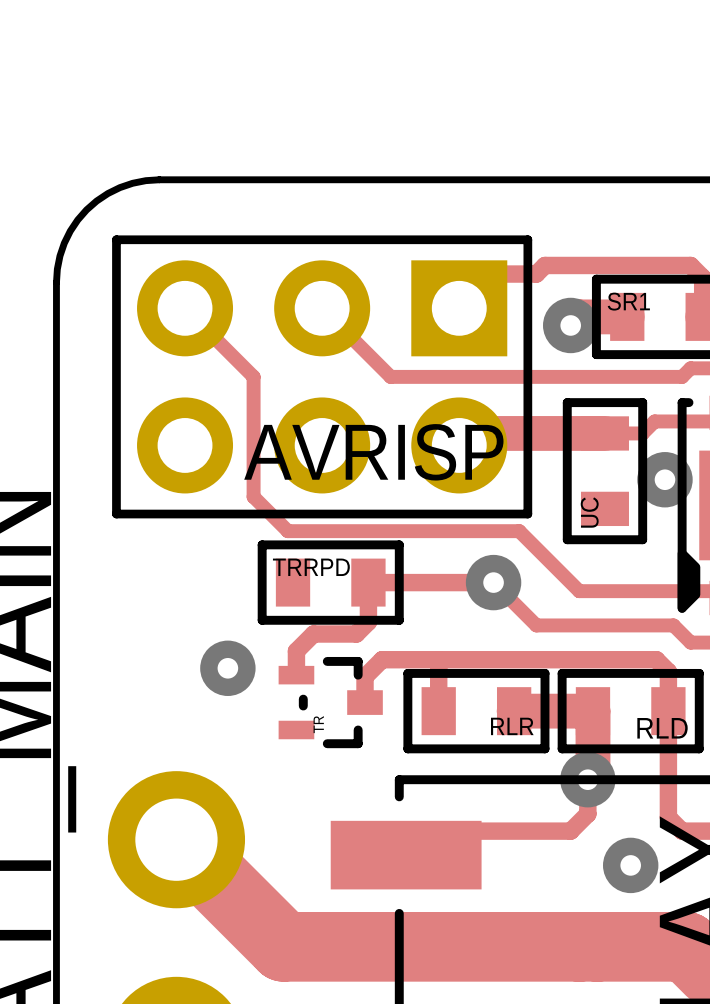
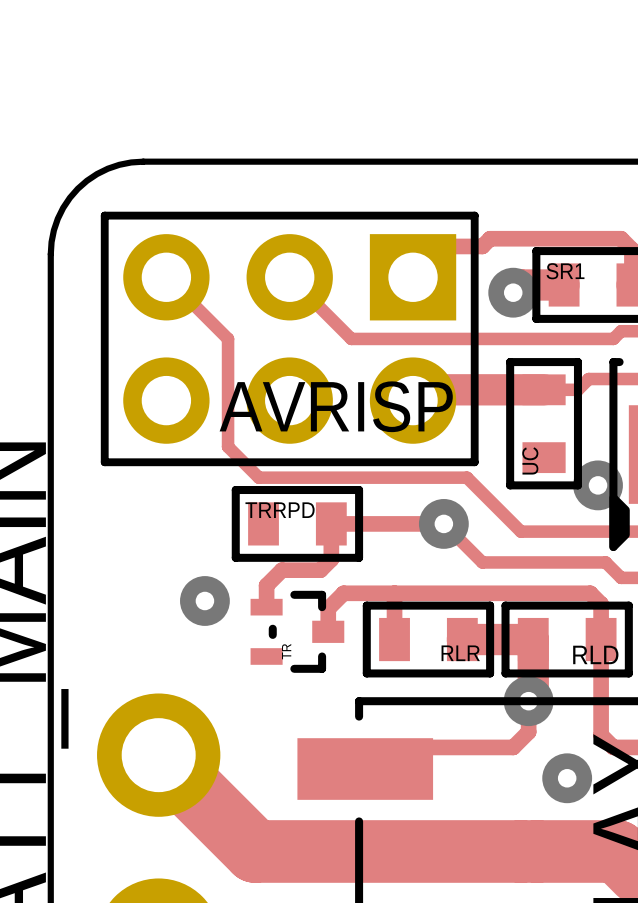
via position: (664, 479) -> (598, 485)

